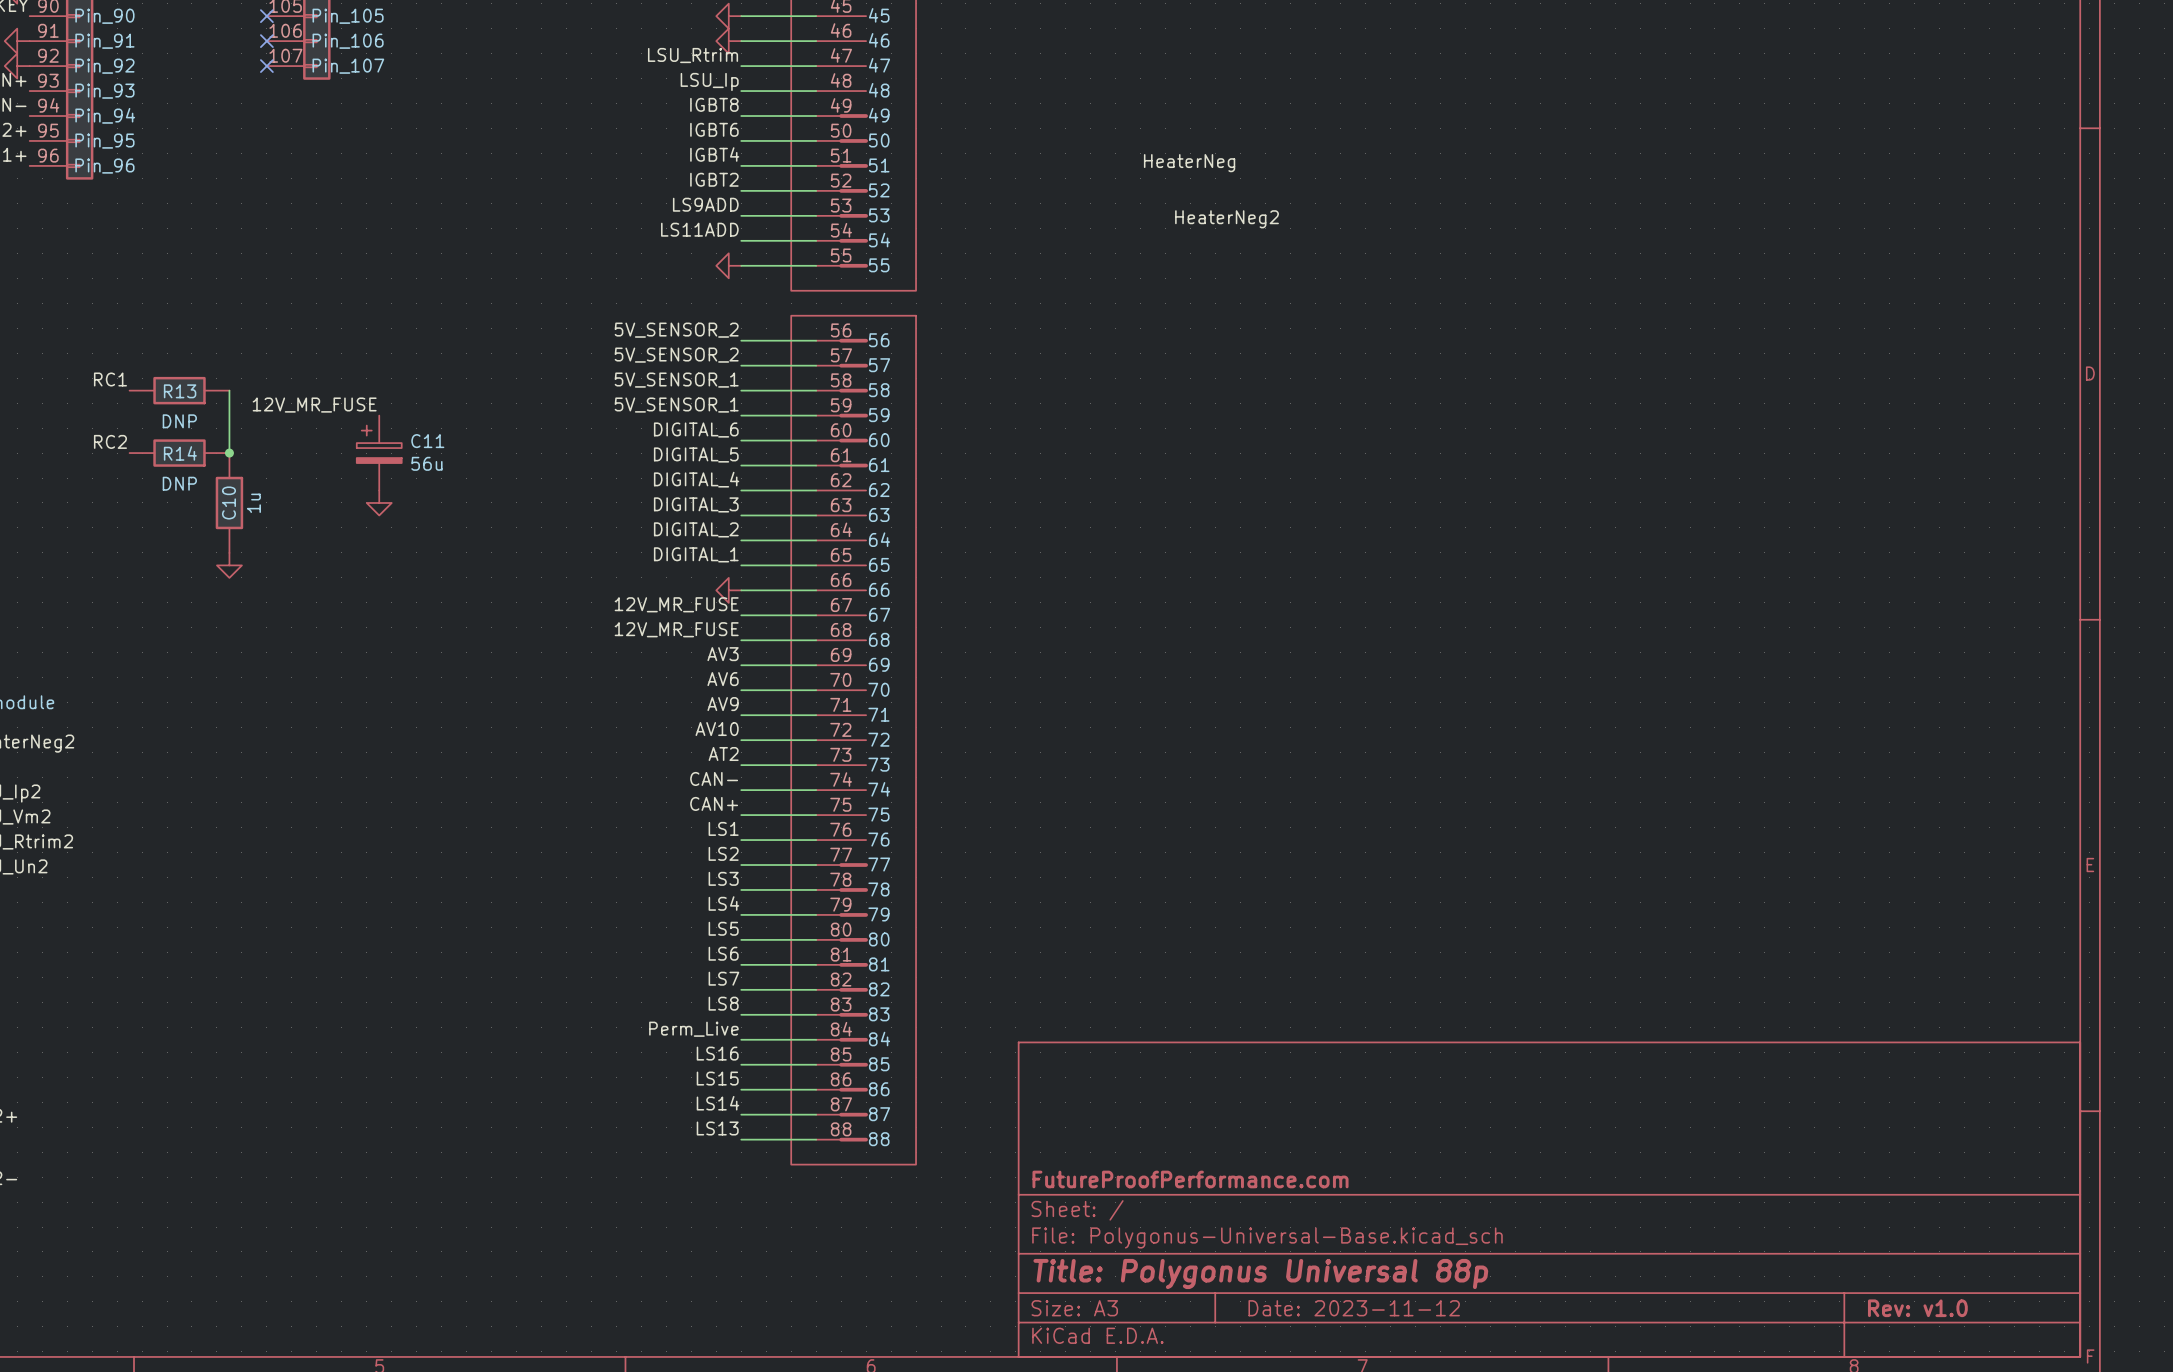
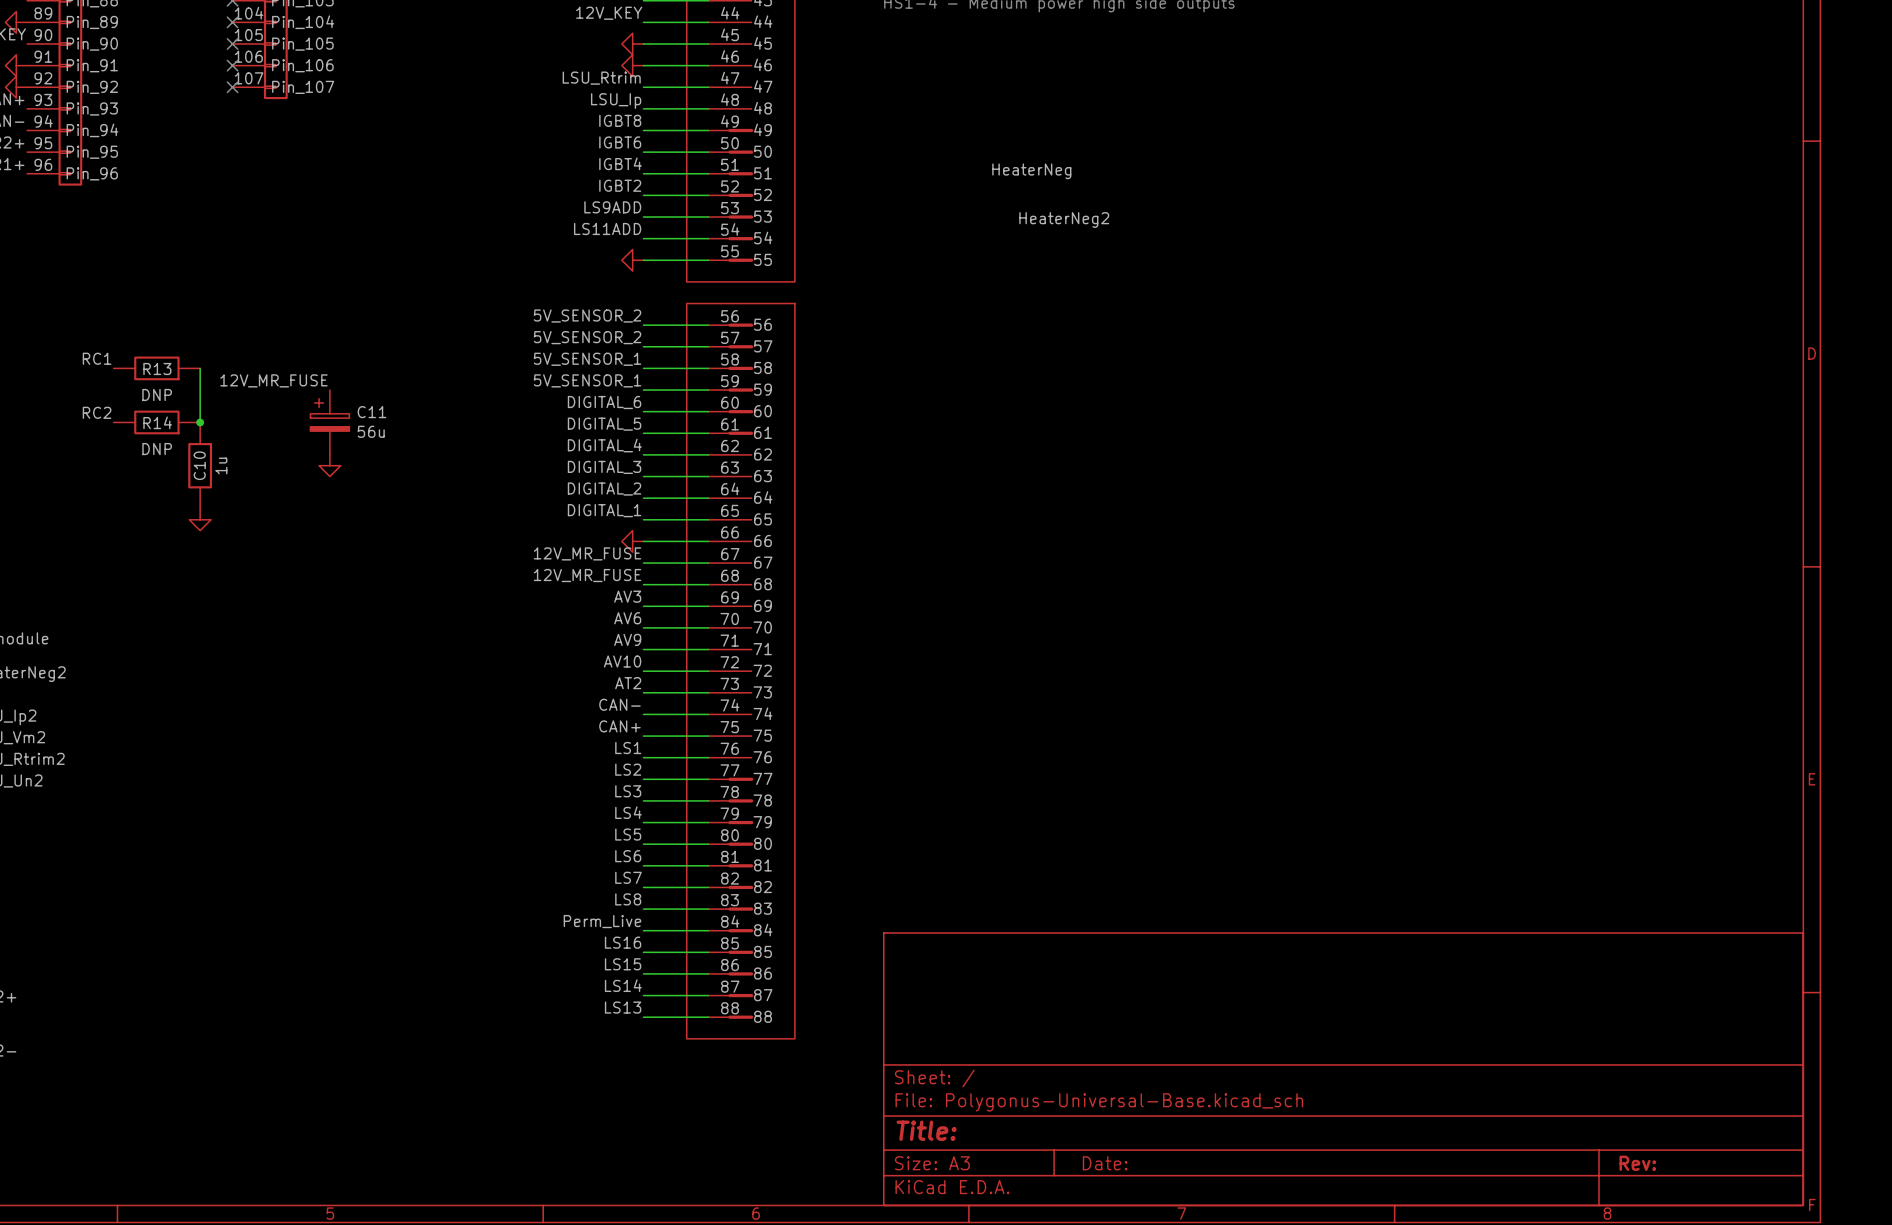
title block: FutureProofPerformance.com (1190, 1179) -> none
title block: Title: Polygonus Universal 88p (1260, 1273) -> Title: (926, 1130)
title block: Date: 2023-11-12 (1354, 1308) -> Date: (1105, 1163)
title block: Rev: v1.0 (1917, 1308) -> Rev: (1637, 1163)

